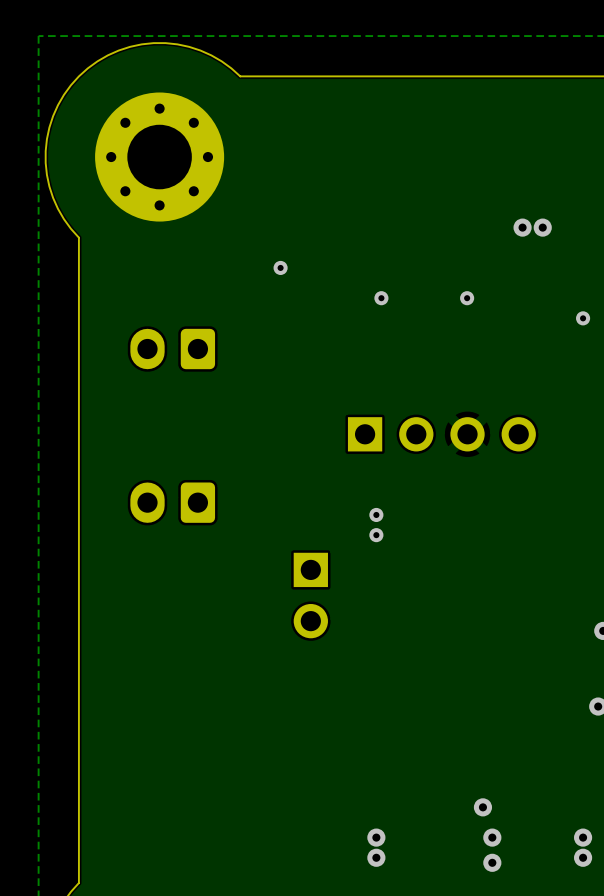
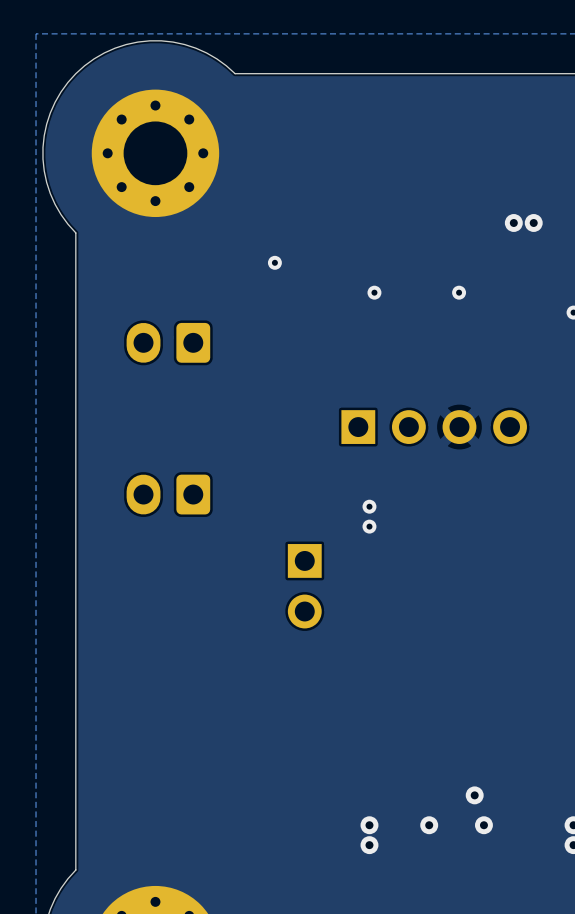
via position: (492, 862) -> (429, 825)

